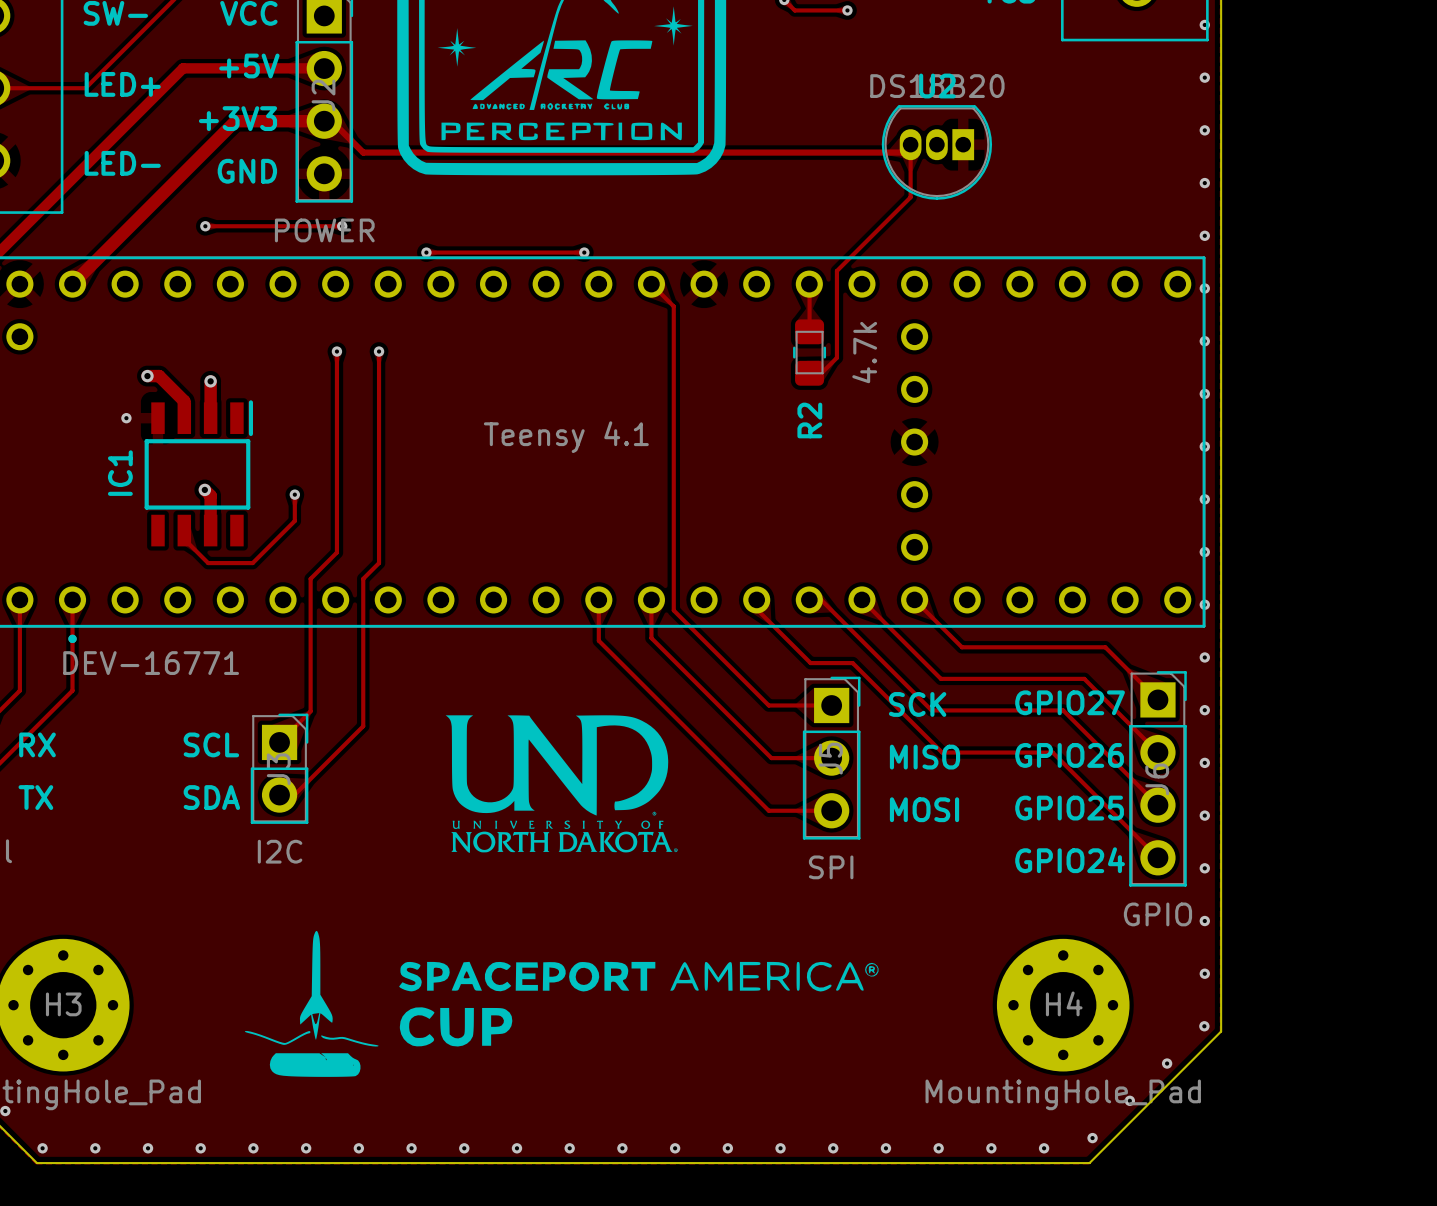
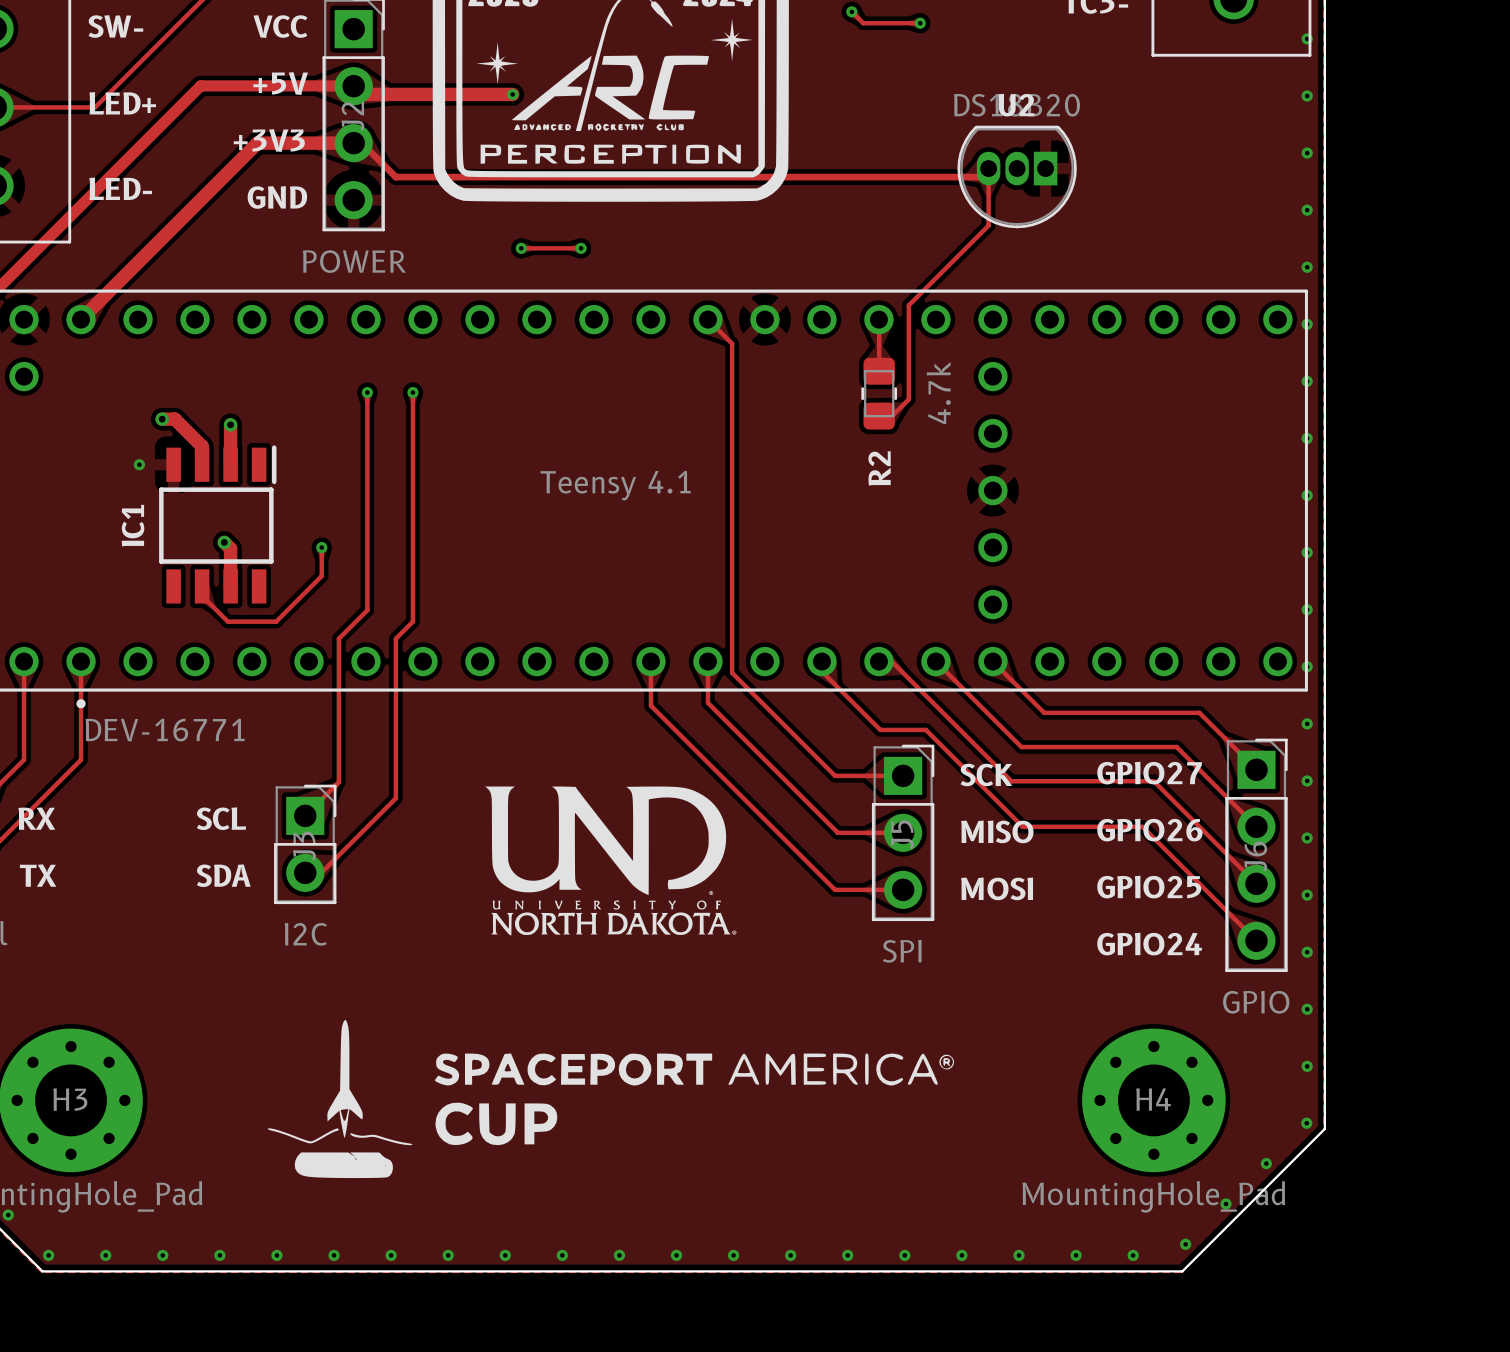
track: none -> (362, 94) (512, 94)
via: none -> (512, 94)
track: none -> (521, 248) (581, 248)
via: none -> (521, 248)
via: none -> (581, 248)
track: (205, 226) (342, 226) -> none
via: (205, 226) -> none
via: (342, 226) -> none
track: (426, 252) (584, 252) -> none
via: (426, 252) -> none
via: (584, 252) -> none

